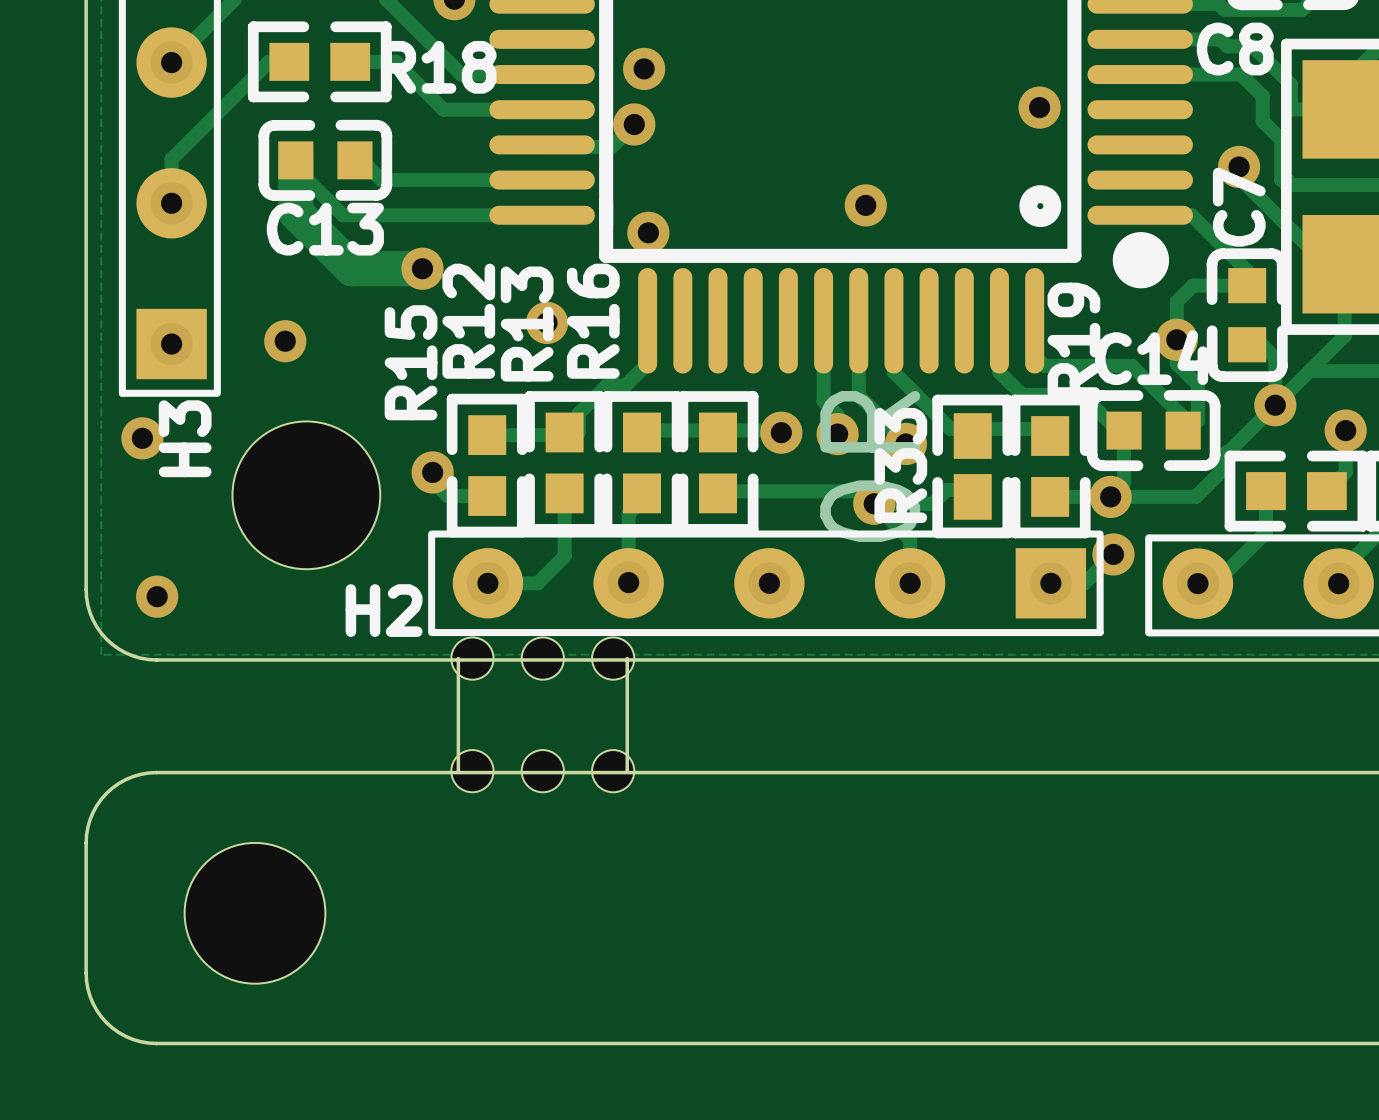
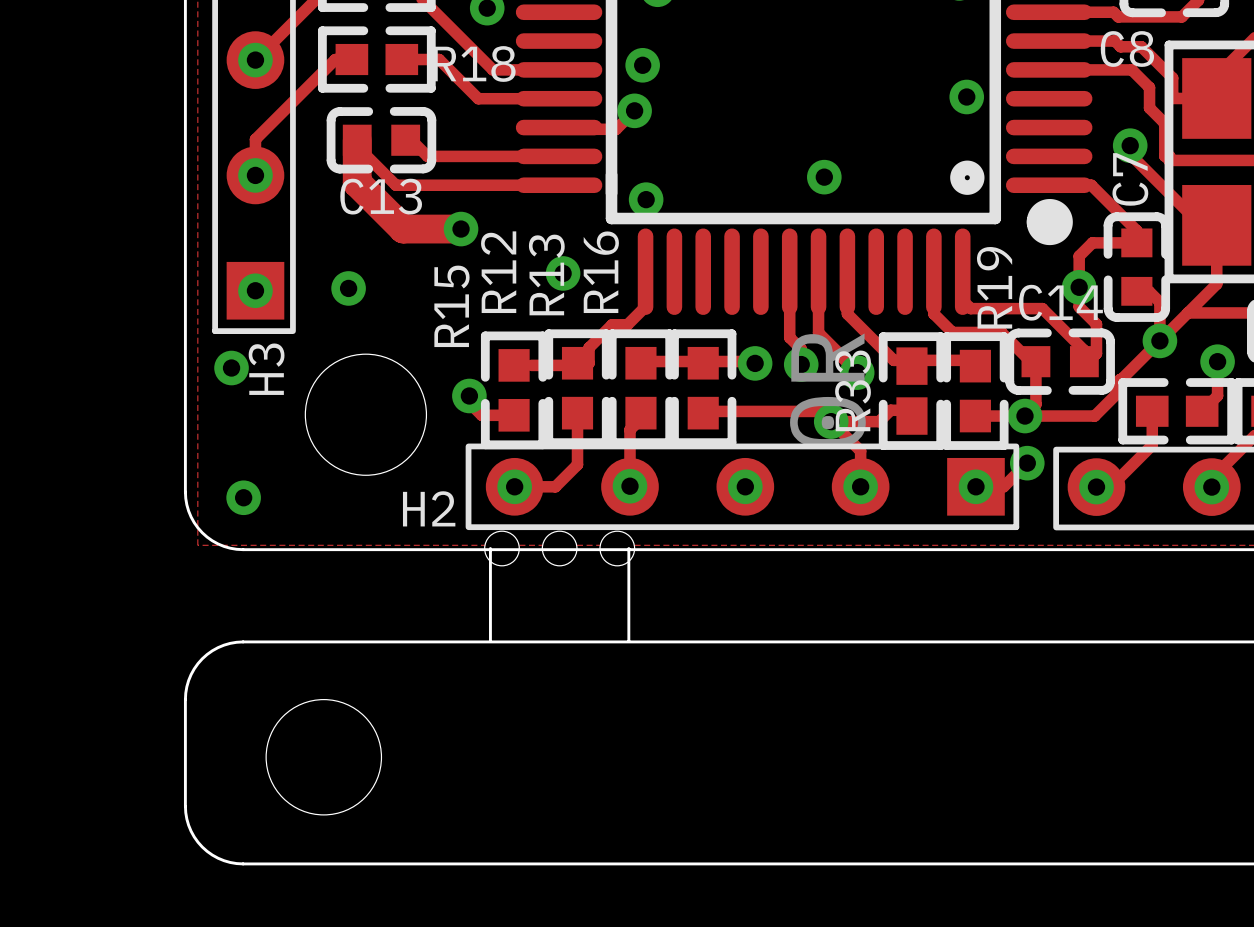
part: (472, 771) -> none
part: (542, 771) -> none
part: (613, 771) -> none

